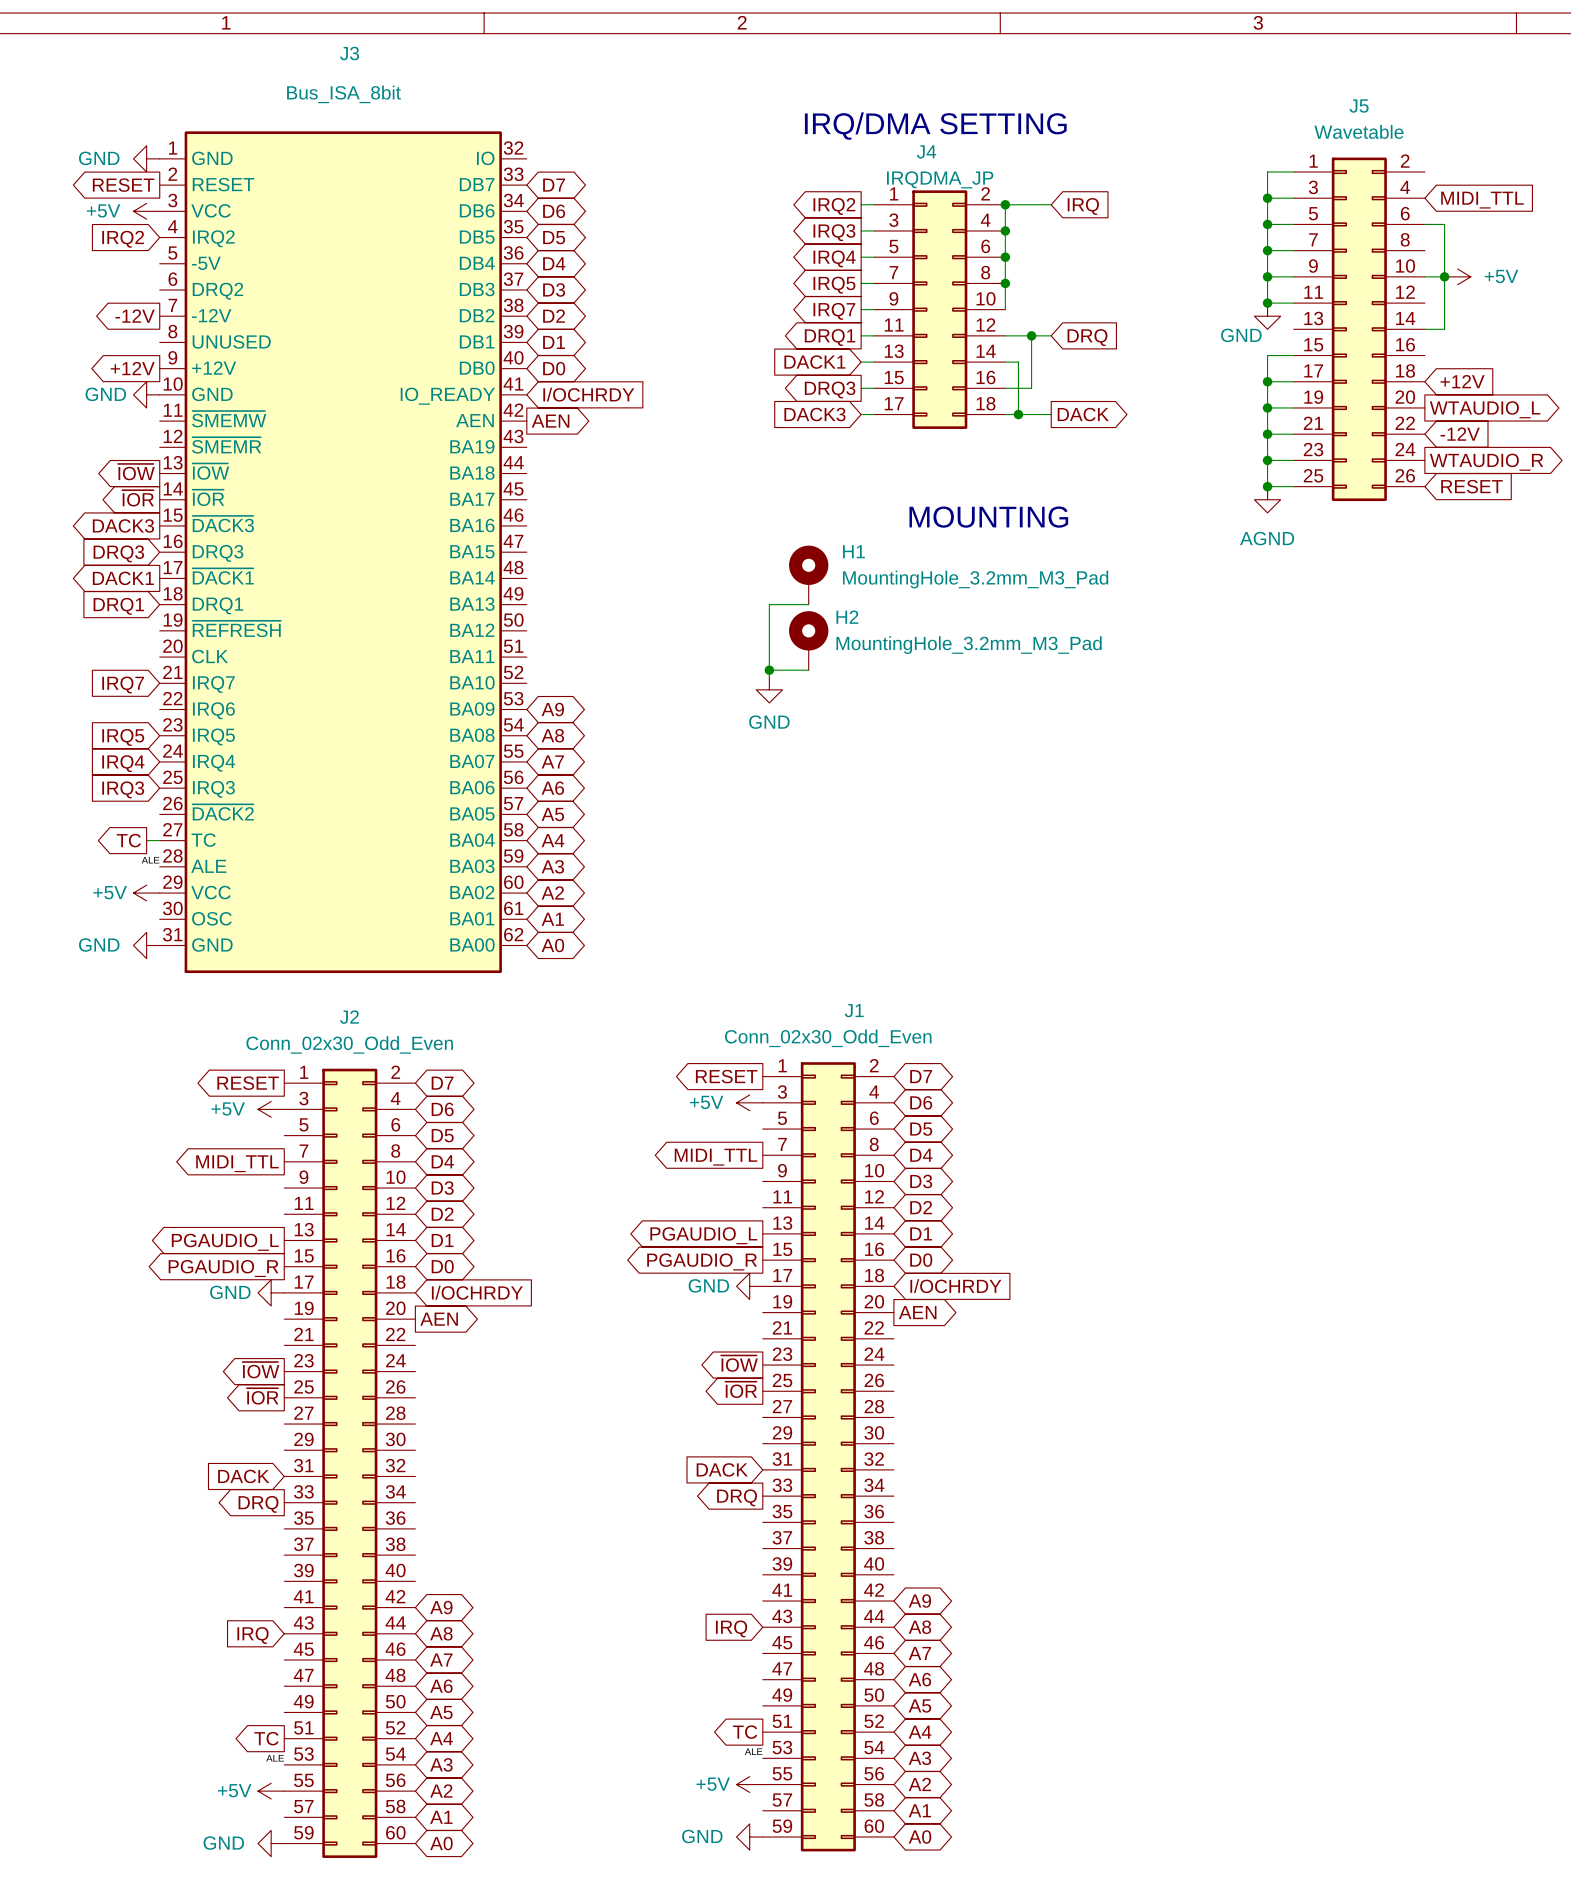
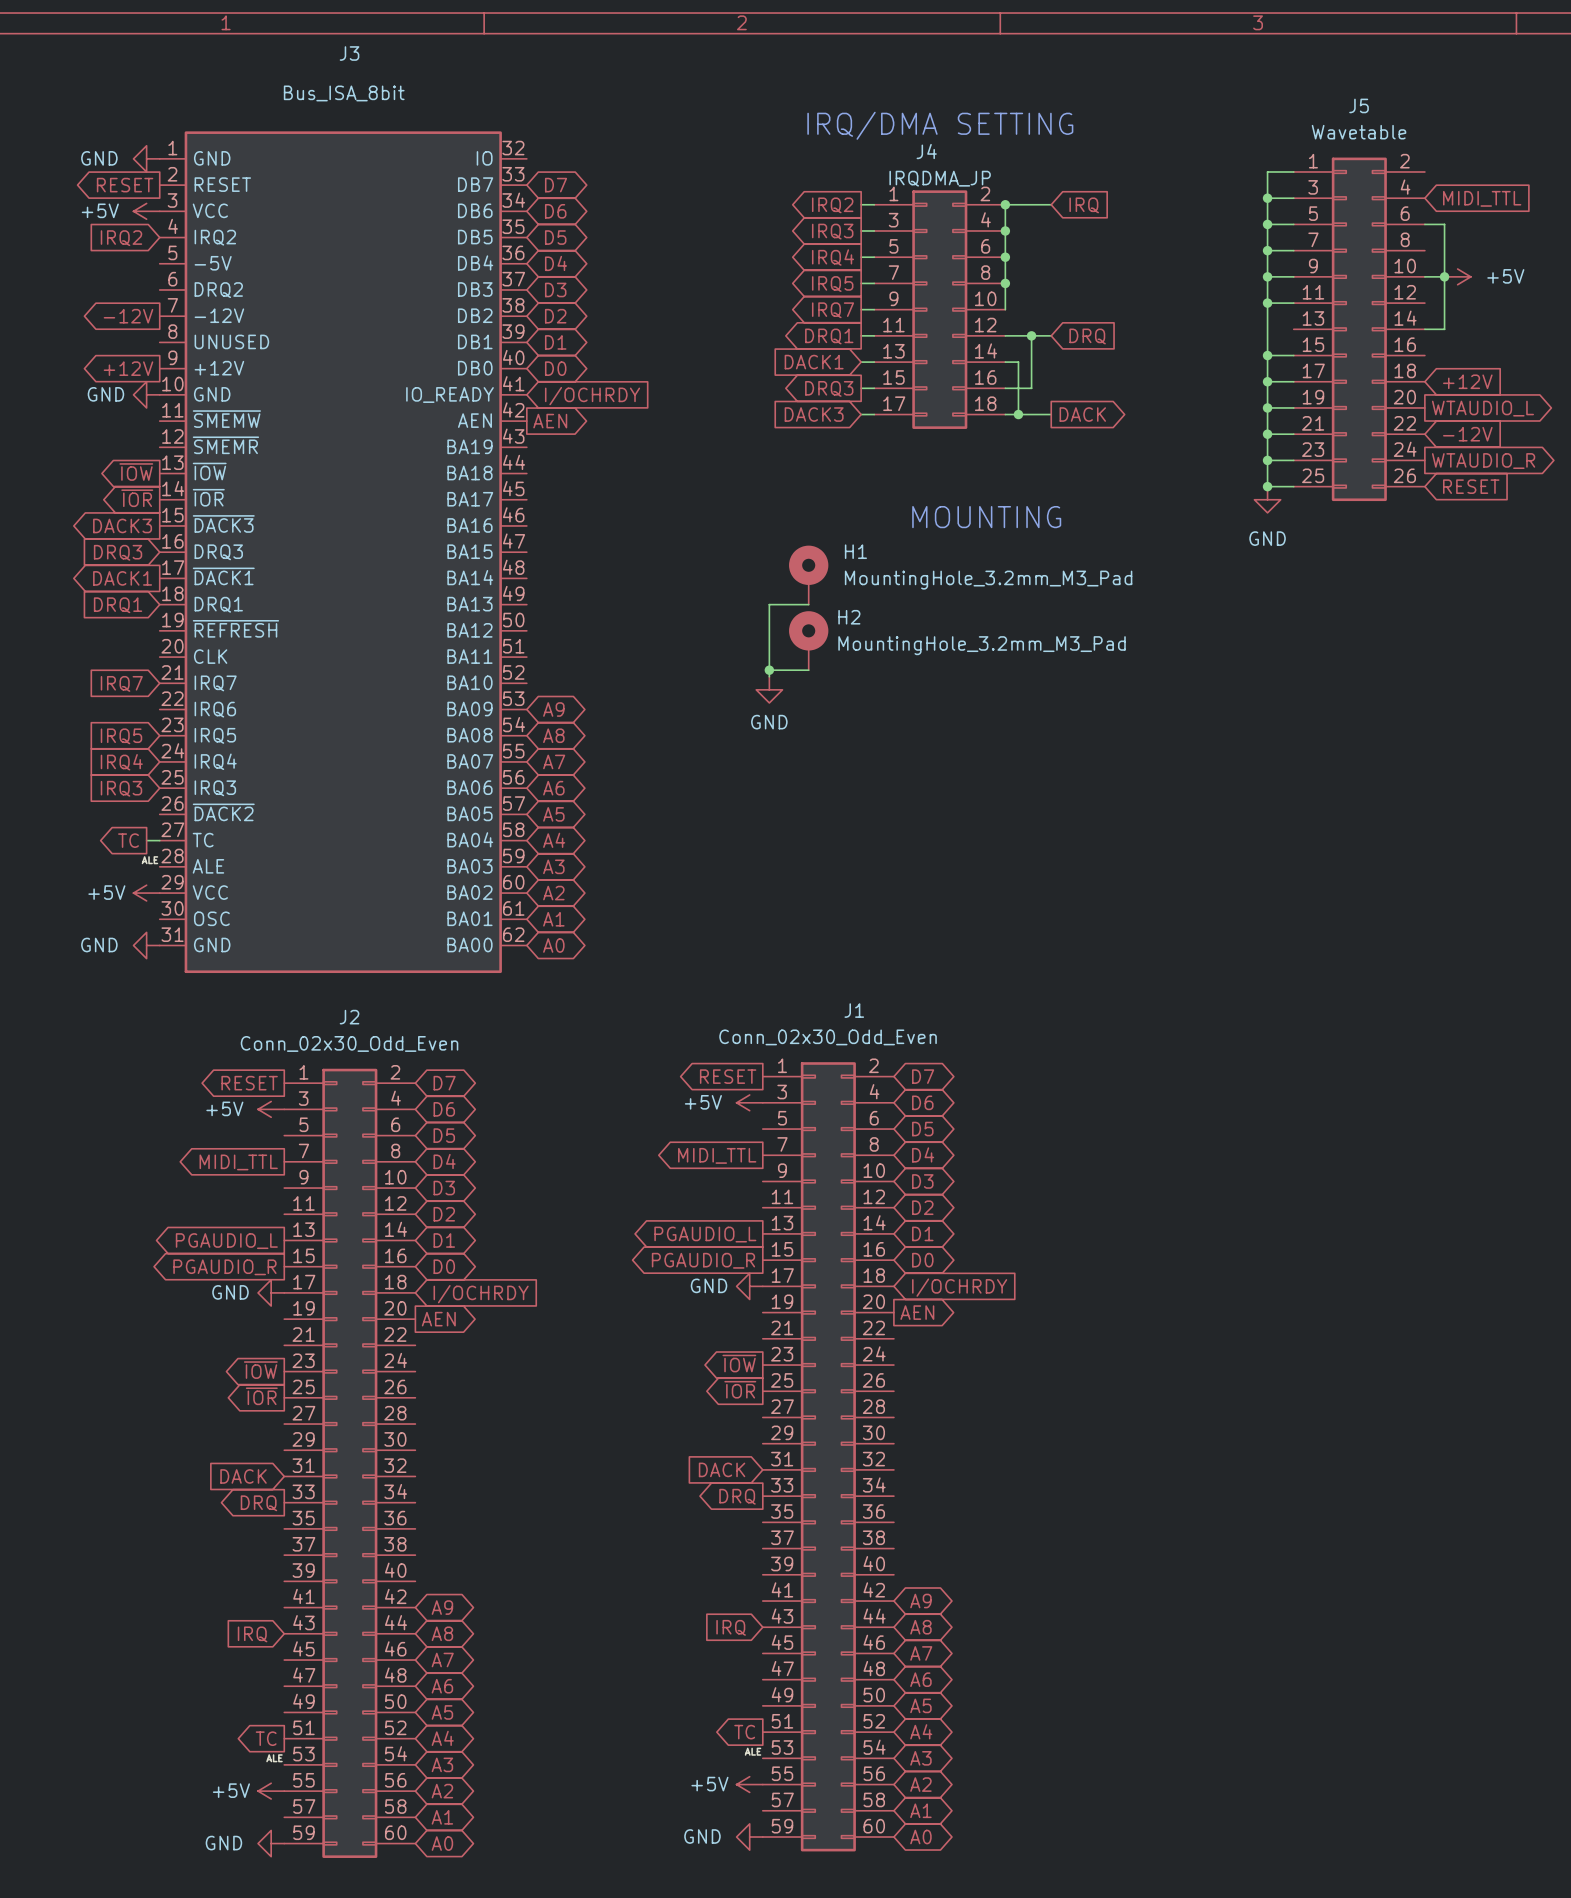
wire: none -> (1267, 303) (1267, 355)
power symbol: GND (1267, 316) -> none
junction: none -> (1267, 355)
power symbol: AGND (1267, 499) -> GND (1267, 499)

